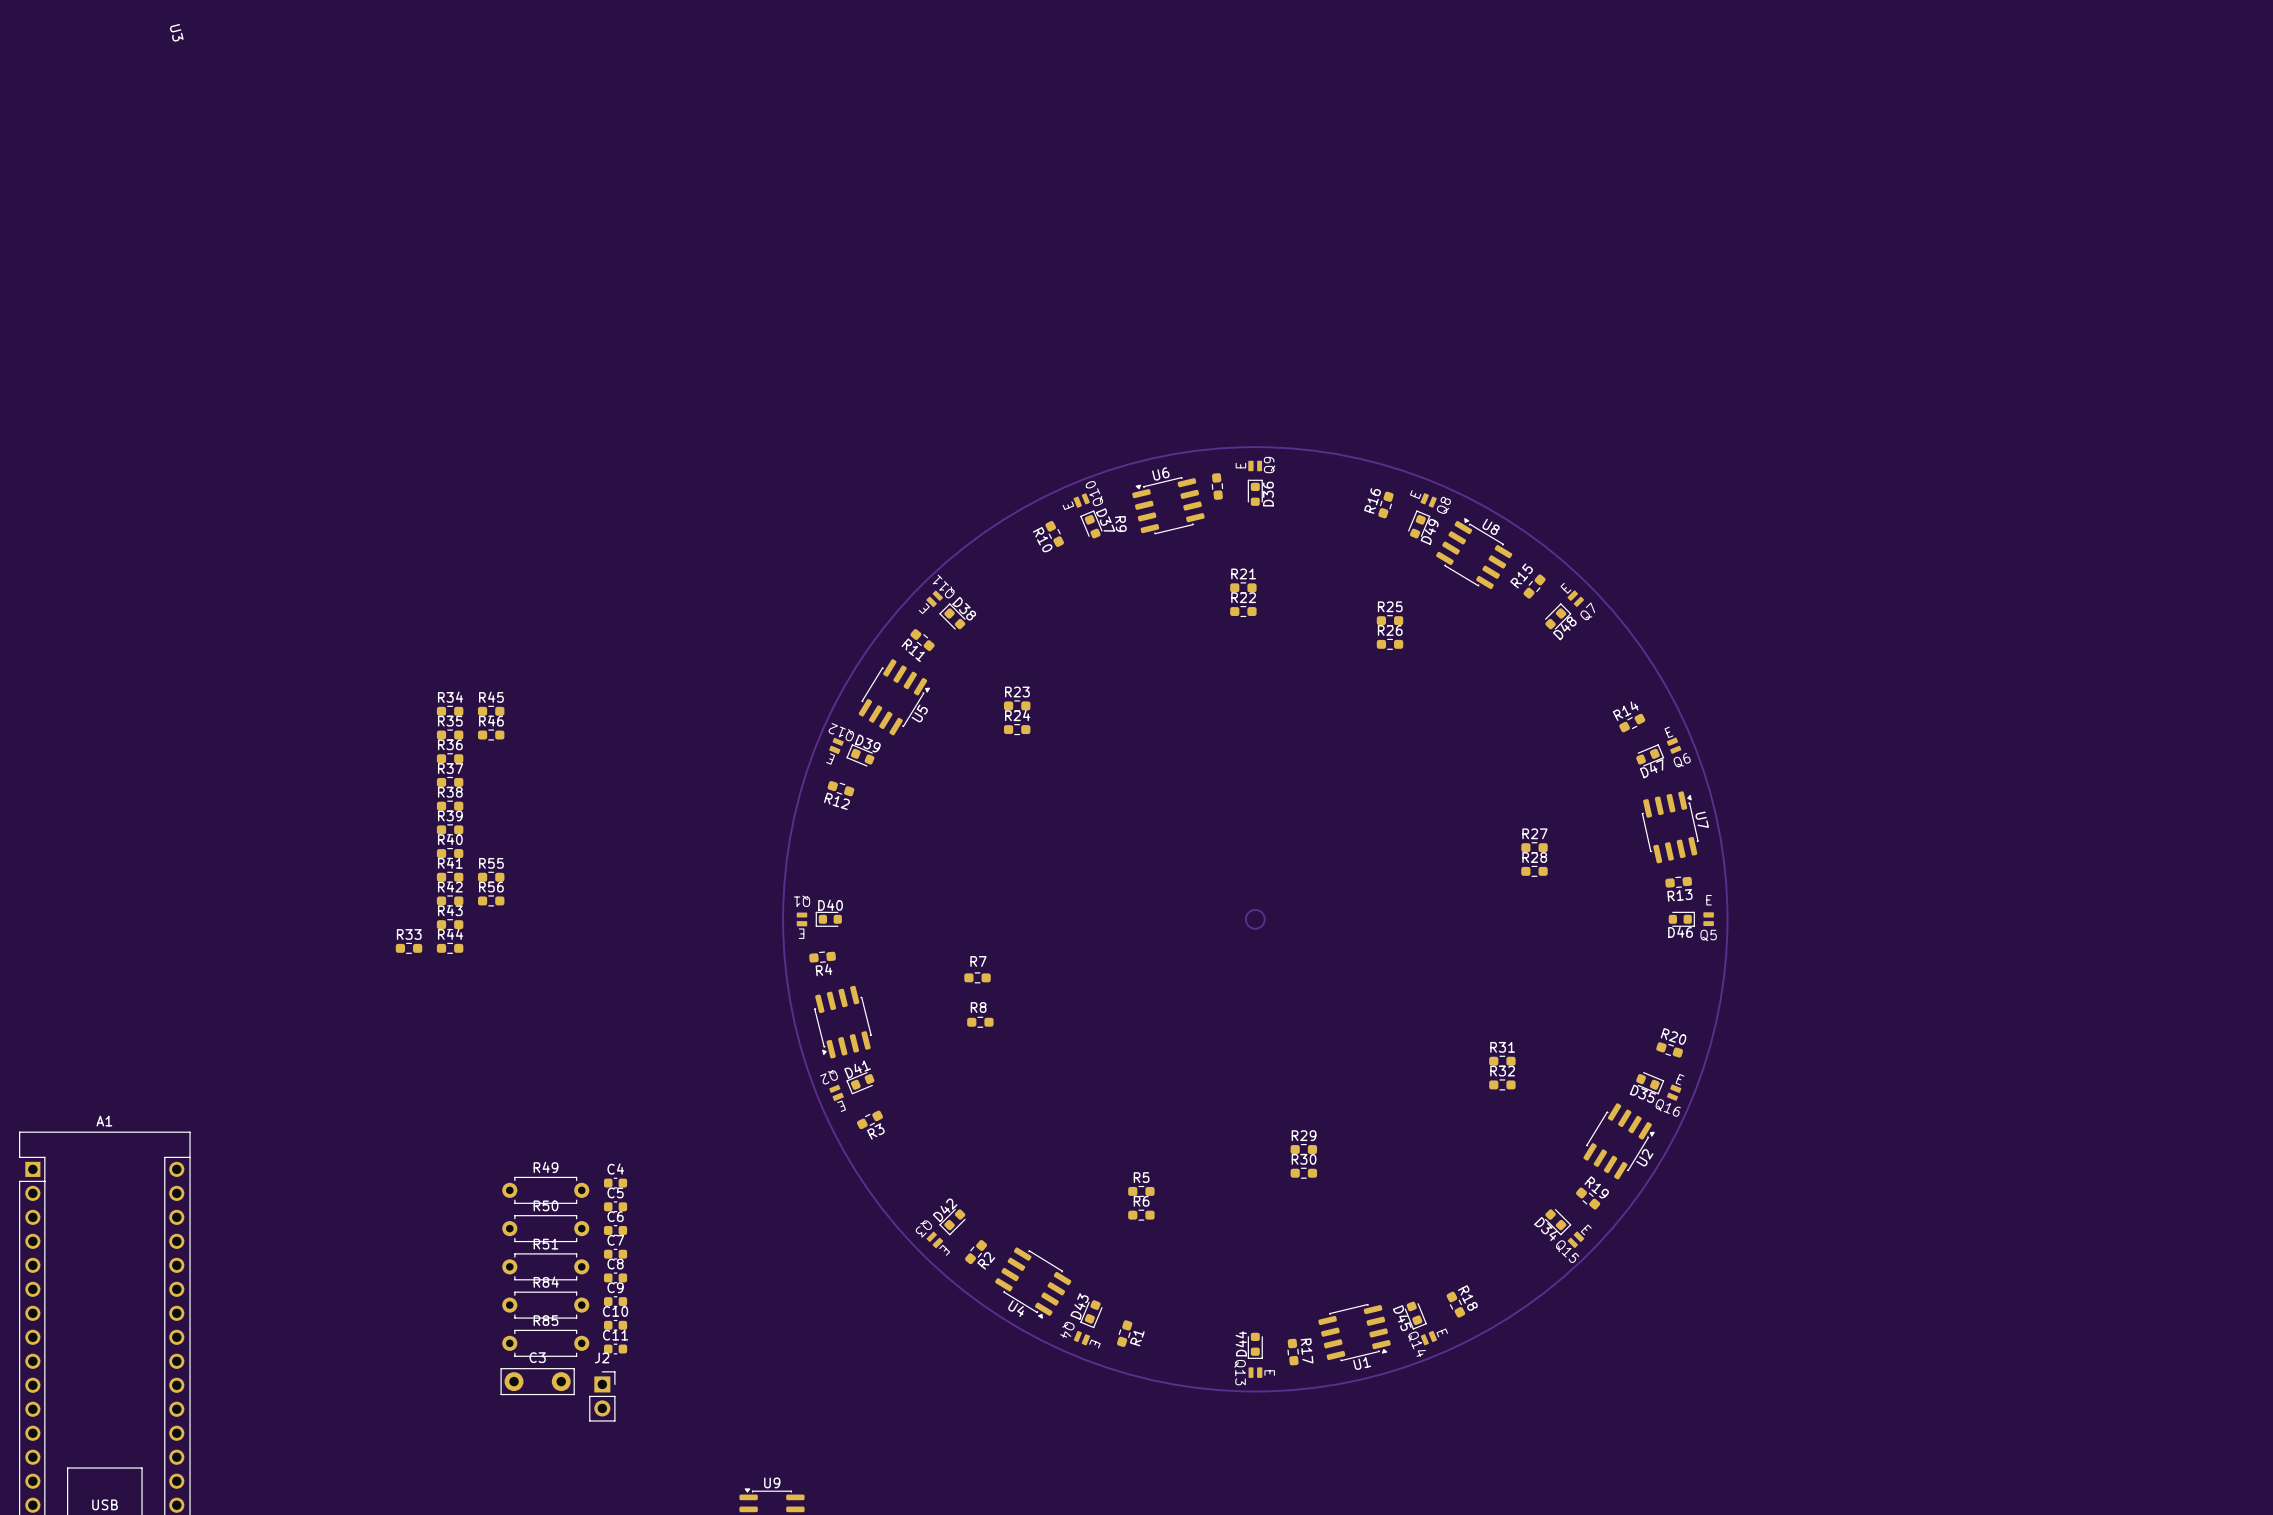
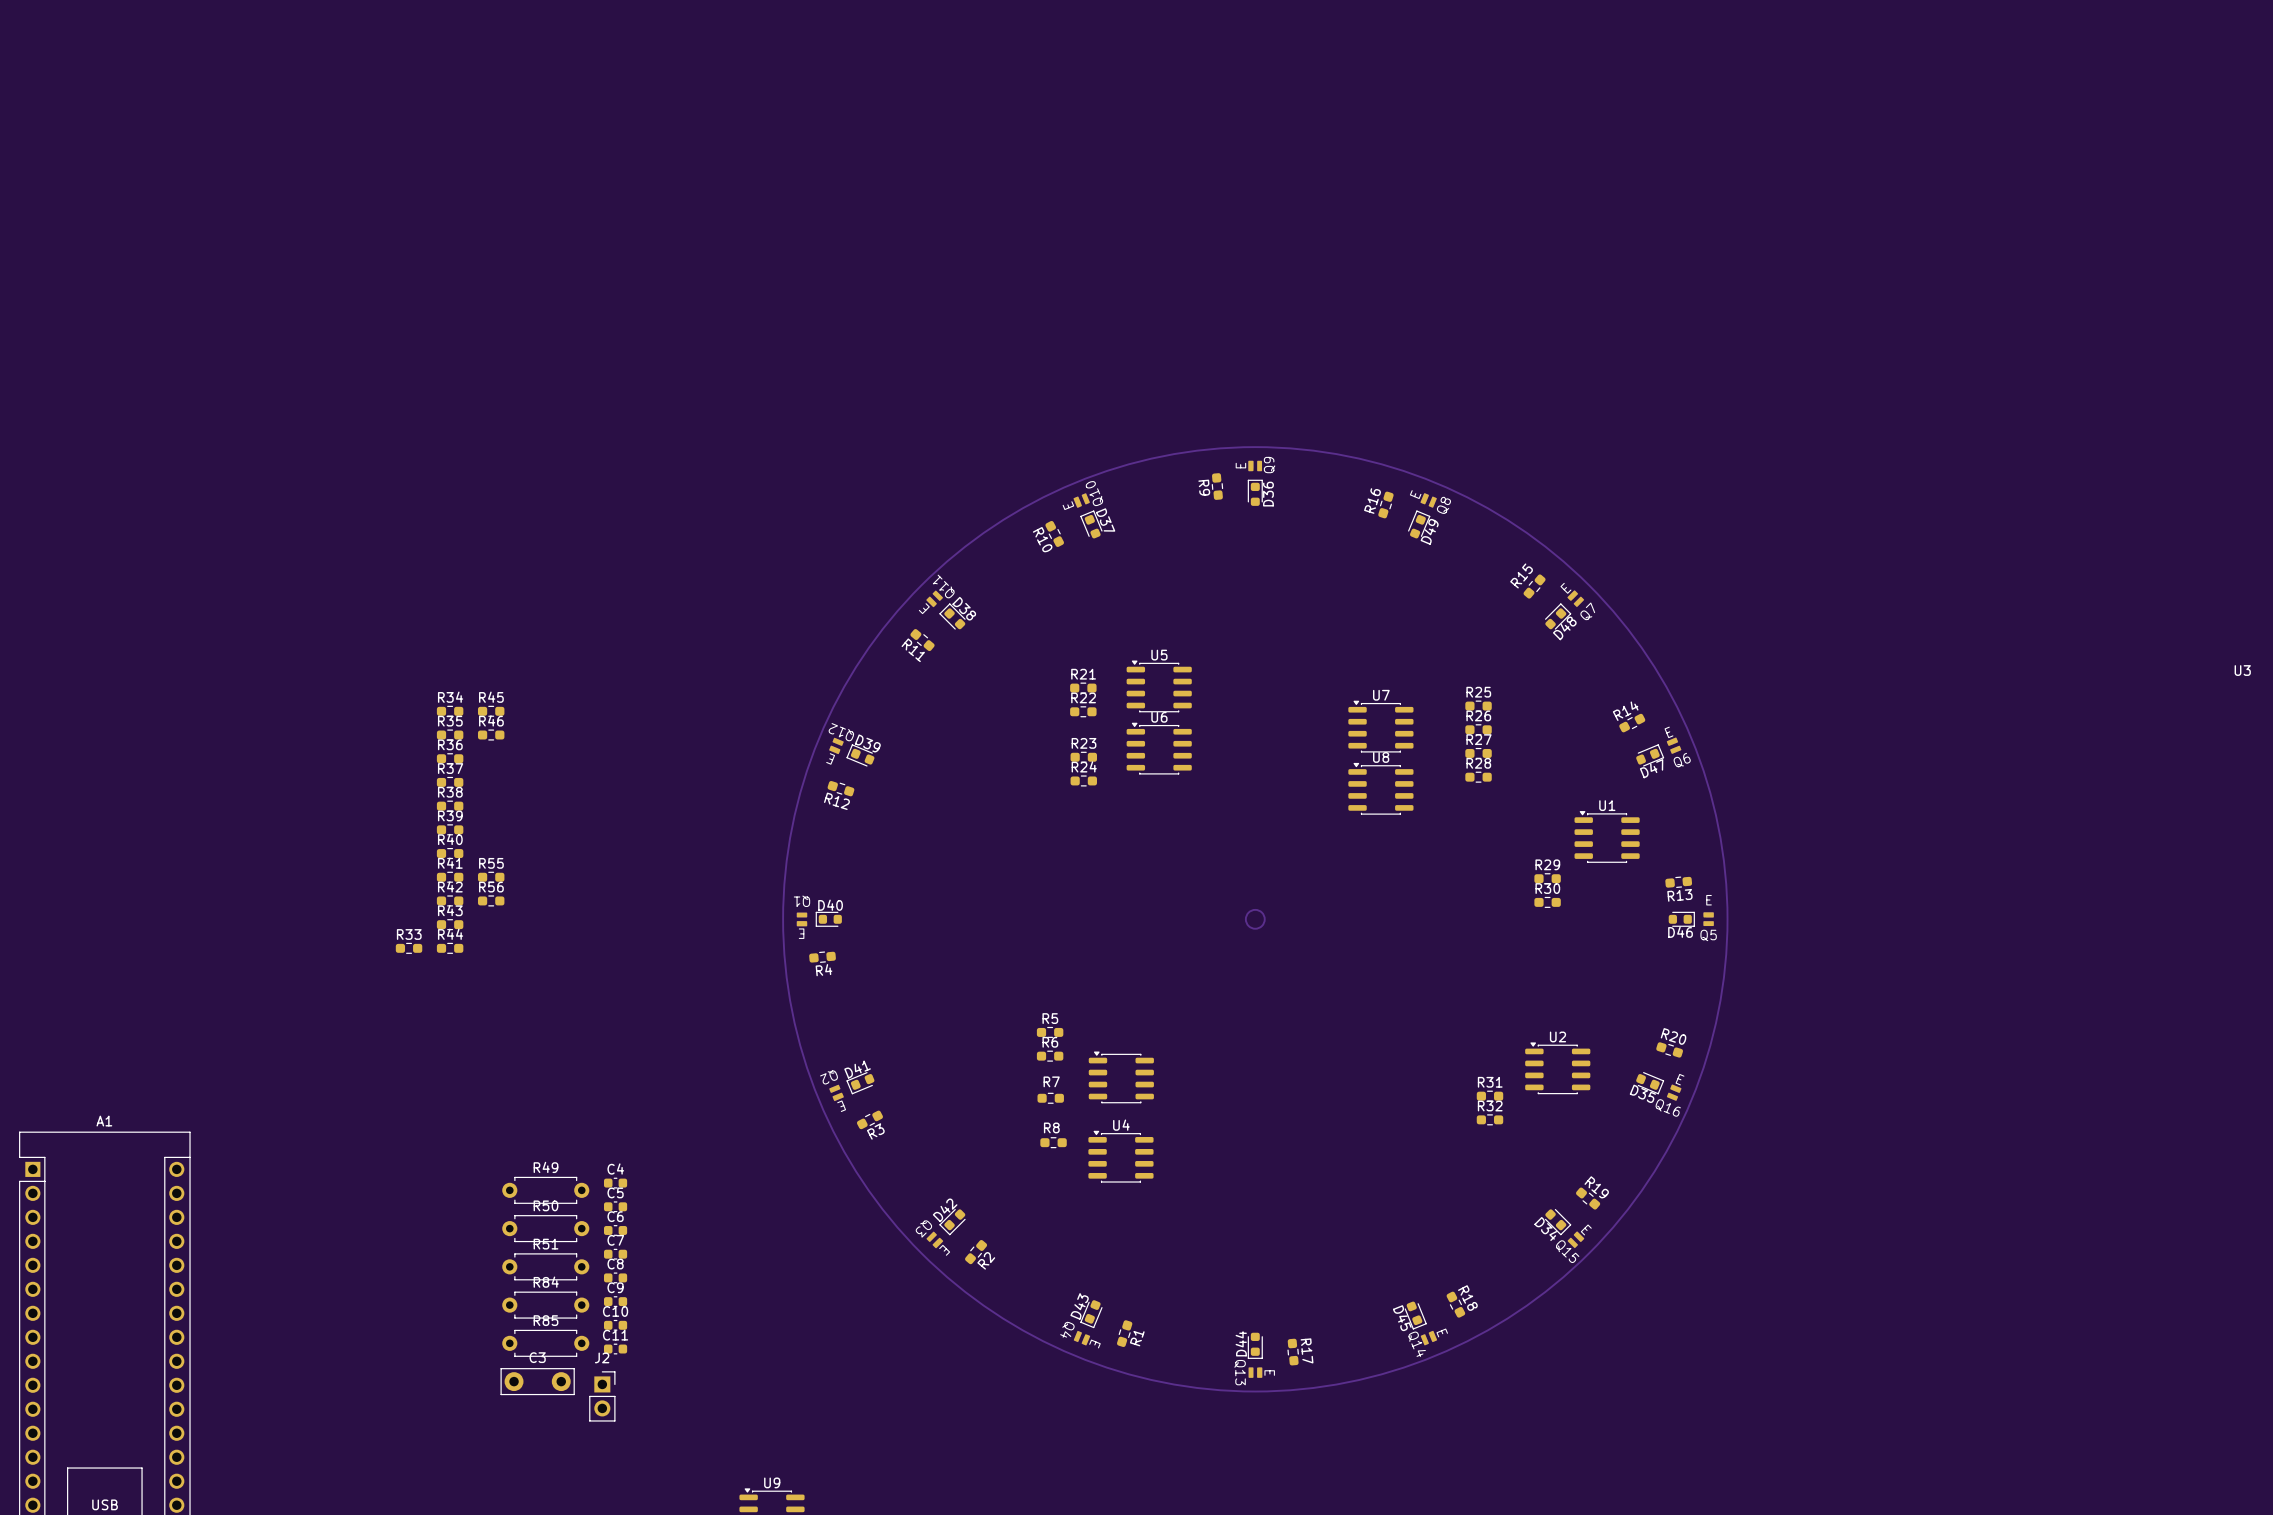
U6 rotation: 0° (1168, 505) -> 13.5° clockwise (1159, 748)
U6 position: (1168, 505) -> (1159, 748)
R9 name position: R9 (1120, 524) -> R9 (1204, 487)
U8 rotation: 0° (1474, 553) -> 31° counterclockwise (1380, 788)
U8 position: (1474, 553) -> (1380, 788)
R21 position: (1243, 587) -> (1083, 688)
R22 position: (1243, 611) -> (1083, 711)
R25 position: (1390, 620) -> (1478, 706)
R26 position: (1390, 644) -> (1478, 729)
U5 rotation: 0° (894, 697) -> 121.5° counterclockwise (1159, 686)
U5 position: (894, 697) -> (1159, 686)
R23 position: (1017, 705) -> (1083, 757)
R24 position: (1017, 729) -> (1083, 780)
U7 rotation: 0° (1670, 827) -> 77.5° counterclockwise (1380, 726)
U7 position: (1670, 827) -> (1380, 726)
R27 position: (1534, 847) -> (1478, 753)
R28 position: (1534, 871) -> (1478, 777)
R7 position: (977, 977) -> (1050, 1098)
U3 rotation: 0° (842, 1022) -> 104° clockwise (1121, 1077)
U3 position: (842, 1022) -> (1121, 1077)
R8 position: (980, 1022) -> (1053, 1142)
R31 position: (1502, 1061) -> (1489, 1096)
R32 position: (1502, 1084) -> (1489, 1119)
U2 rotation: 0° (1619, 1141) -> 121.5° counterclockwise (1557, 1068)
U2 position: (1619, 1141) -> (1557, 1068)
R29 position: (1303, 1149) -> (1547, 878)
R30 position: (1303, 1173) -> (1547, 902)
R5 position: (1141, 1191) -> (1050, 1032)
R6 position: (1141, 1215) -> (1050, 1056)
U4 rotation: 0° (1033, 1283) -> 148.5° clockwise (1120, 1156)
U4 position: (1033, 1283) -> (1120, 1156)
U1 rotation: 0° (1354, 1332) -> 166.5° counterclockwise (1607, 836)
U1 position: (1354, 1332) -> (1607, 836)

